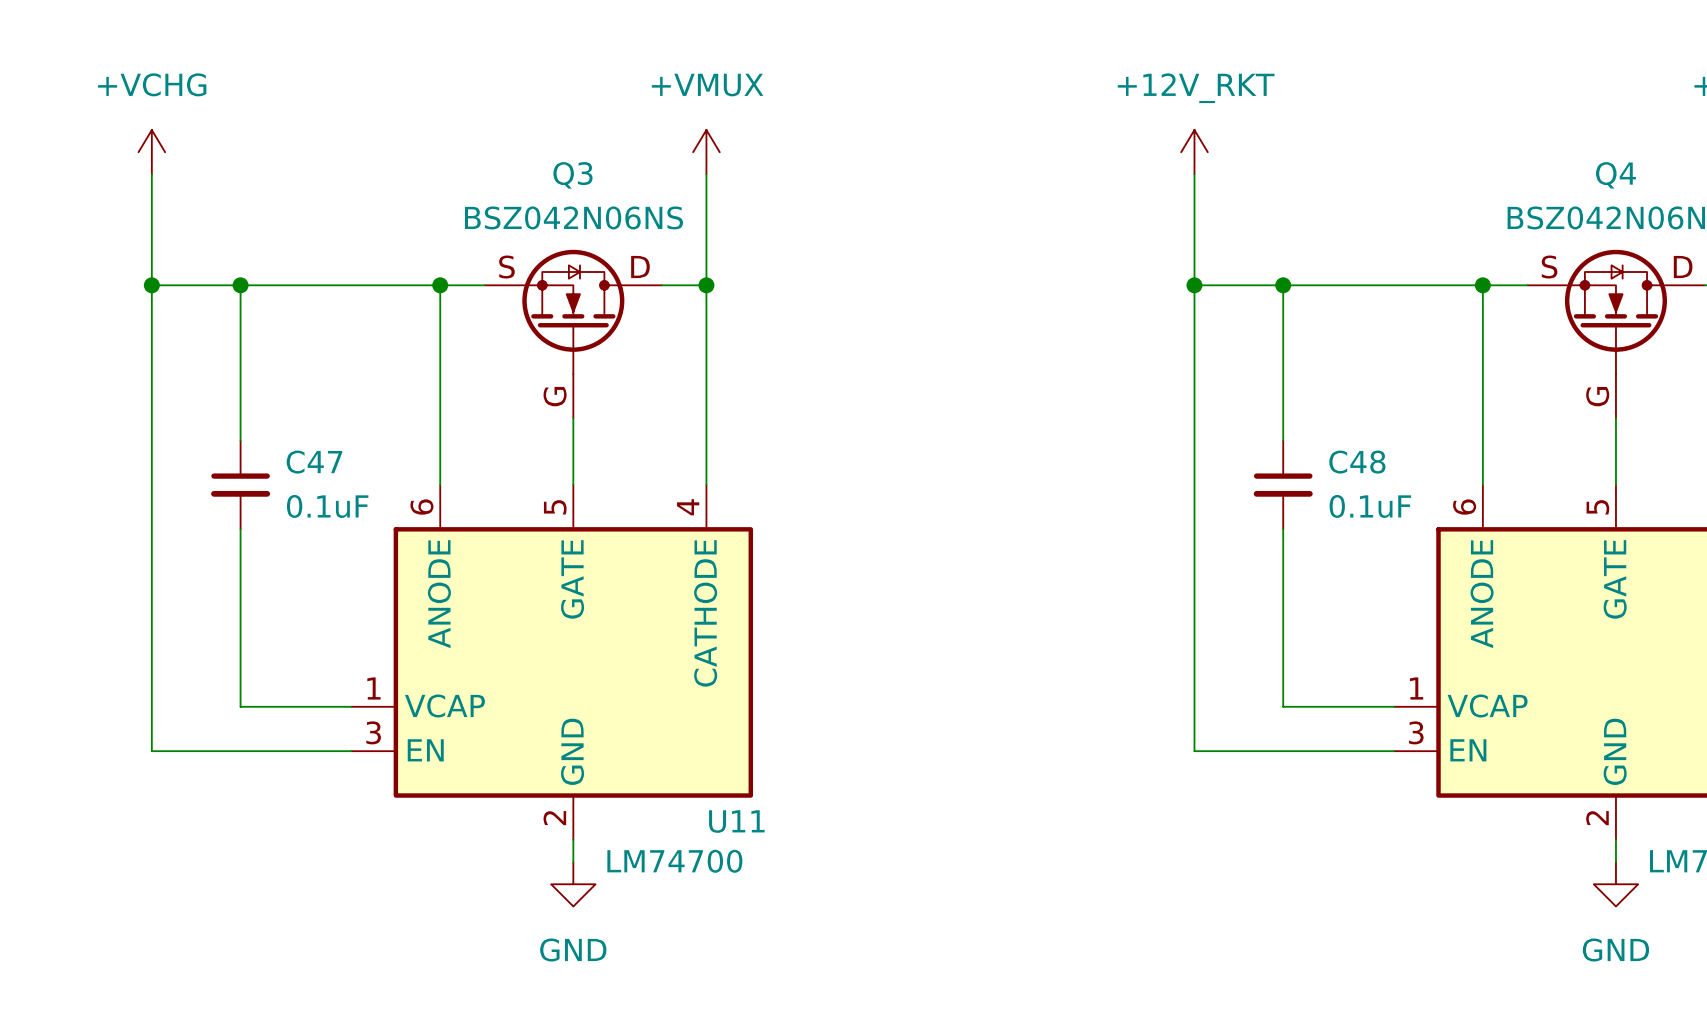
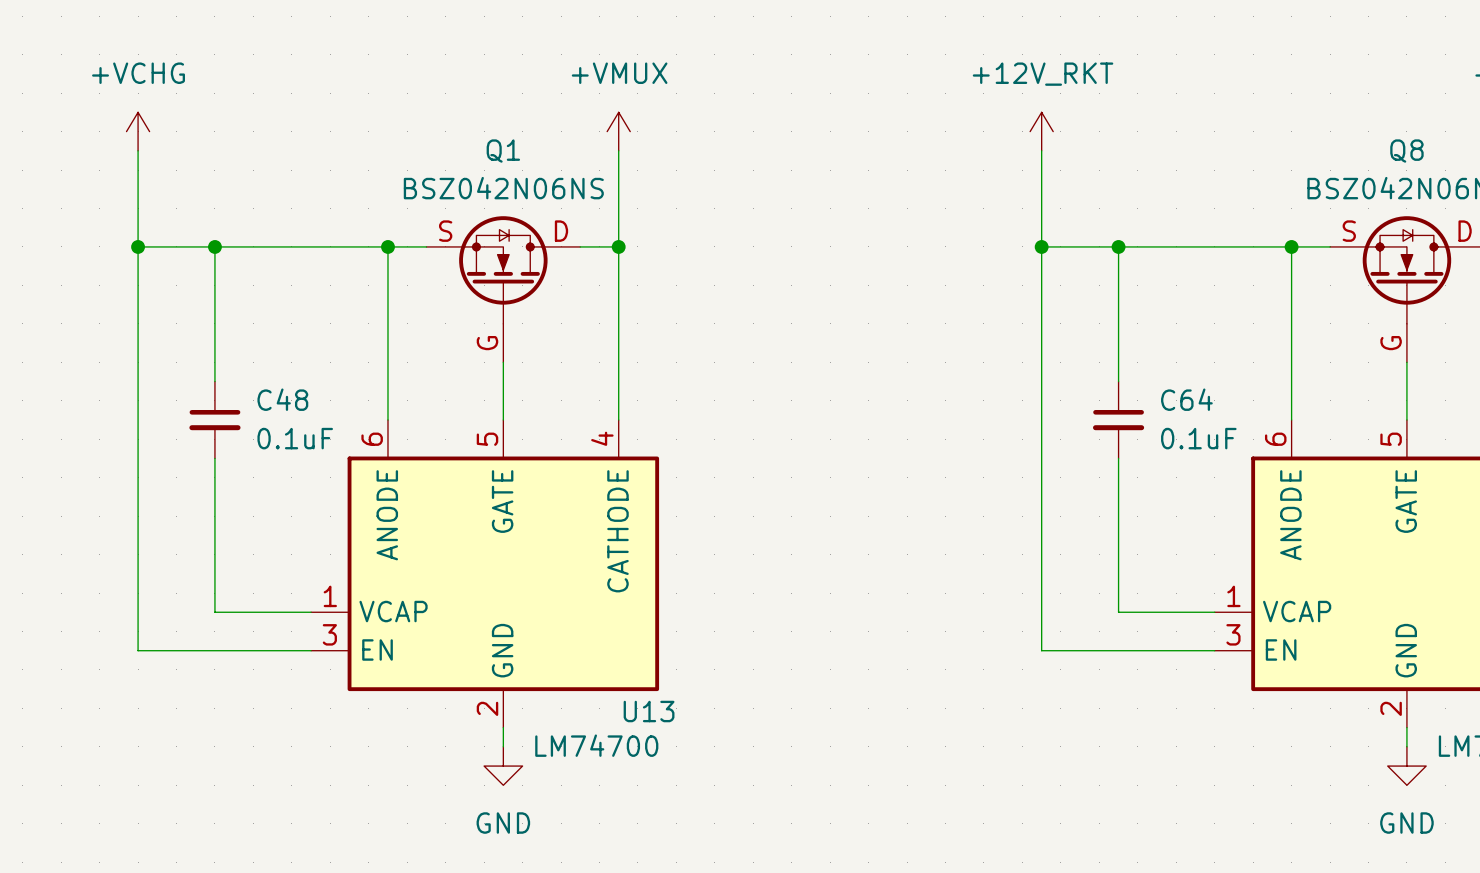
Q3 name: Q3 (572, 175) -> Q1 (503, 151)
Q4 name: Q4 (1615, 175) -> Q8 (1406, 151)
C47 name: C47 (314, 462) -> C48 (282, 399)
C48 name: C48 (1357, 462) -> C64 (1186, 399)
U11 name: U11 (736, 821) -> U13 (649, 711)

